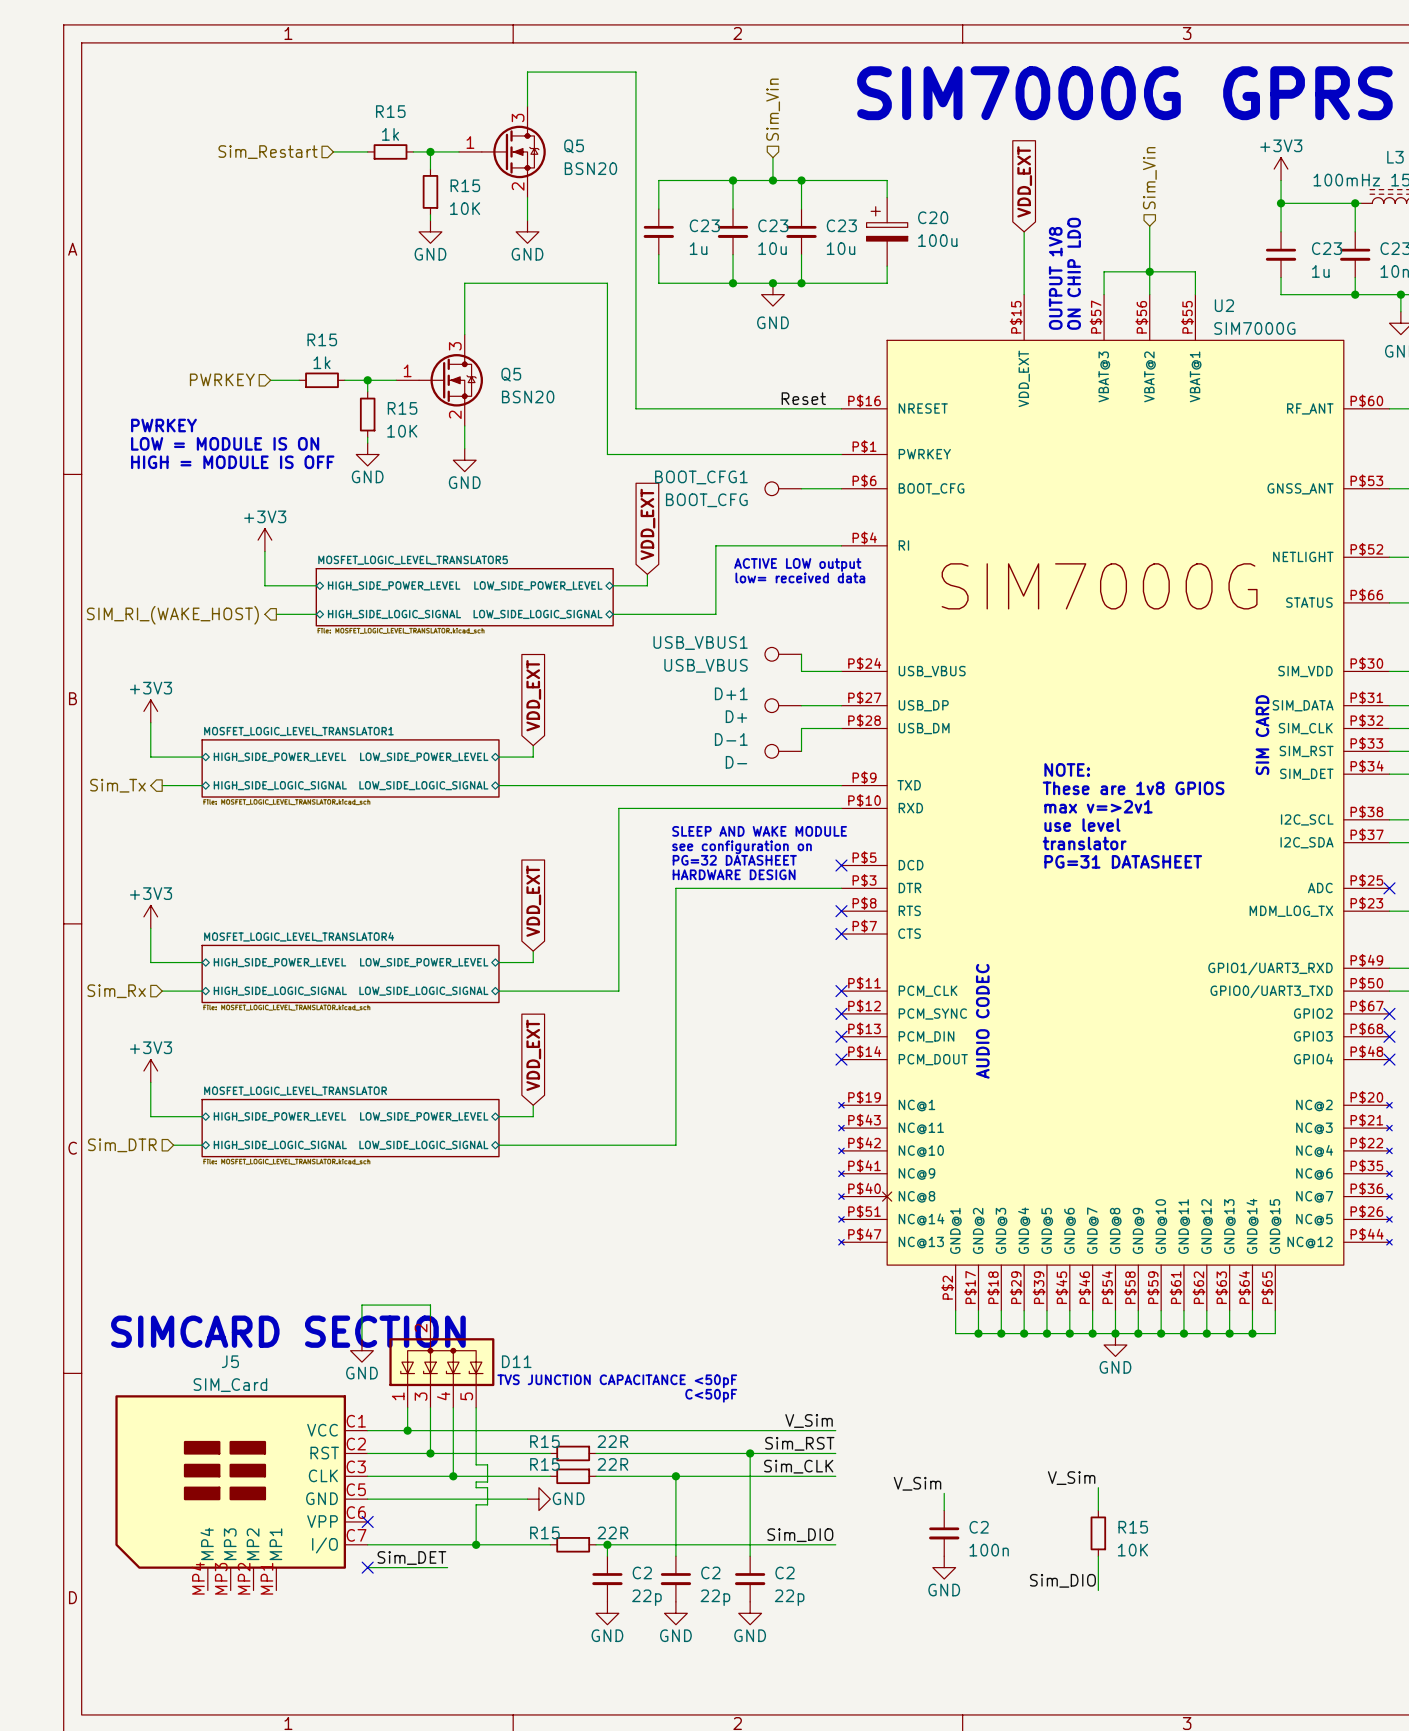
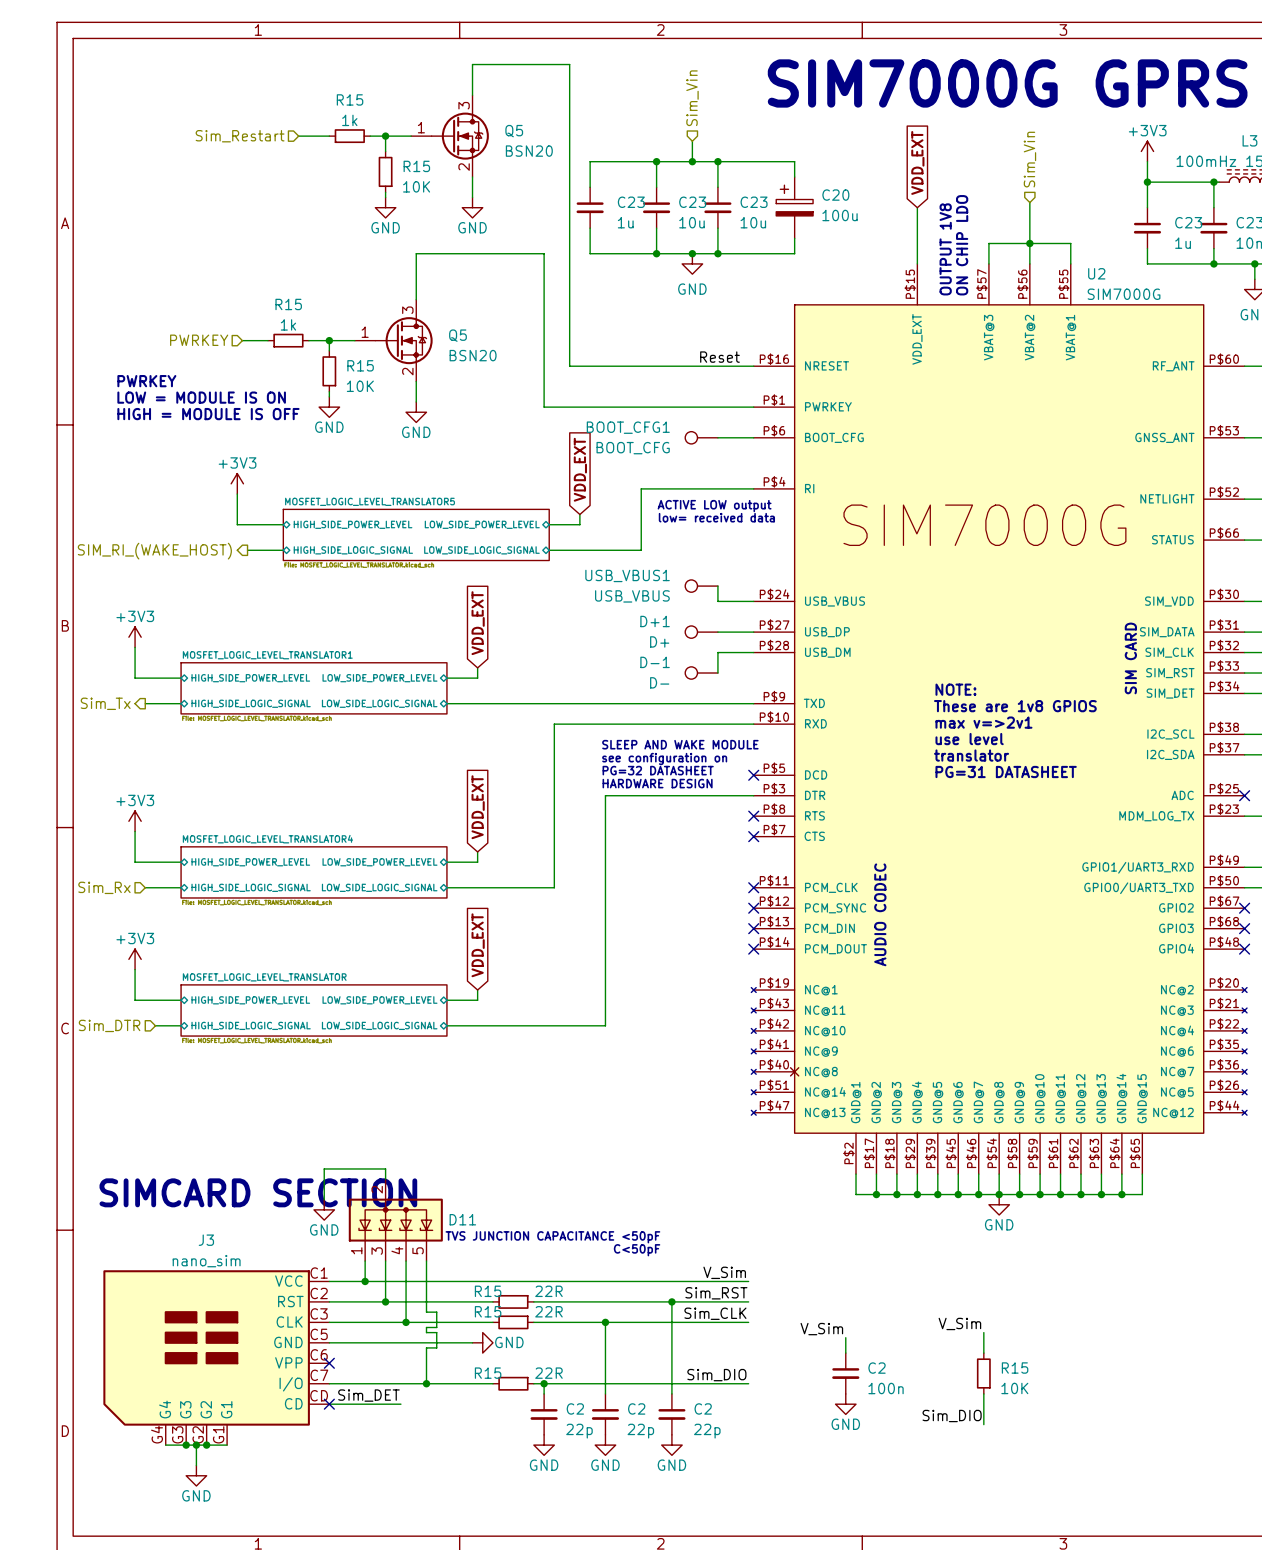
J5: SIM_Card (241, 1492) -> none
J3: none -> nano_sim (216, 1357)
wire: none -> (165, 1445) (227, 1445)
junction: none -> (186, 1445)
wire: none -> (196, 1445) (196, 1465)
junction: none -> (196, 1445)
junction: none -> (206, 1445)
power symbol: none -> GND (196, 1475)

